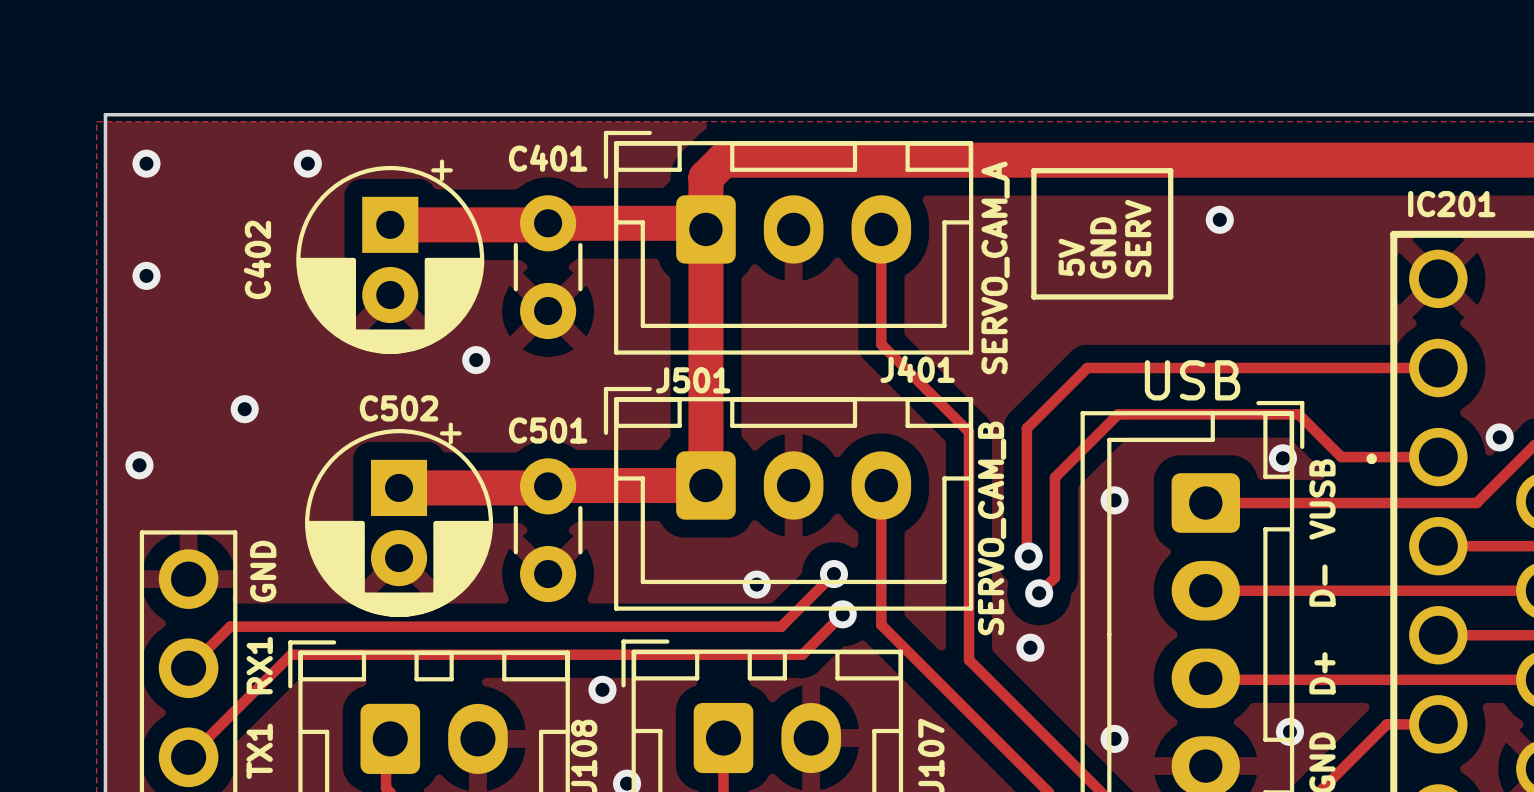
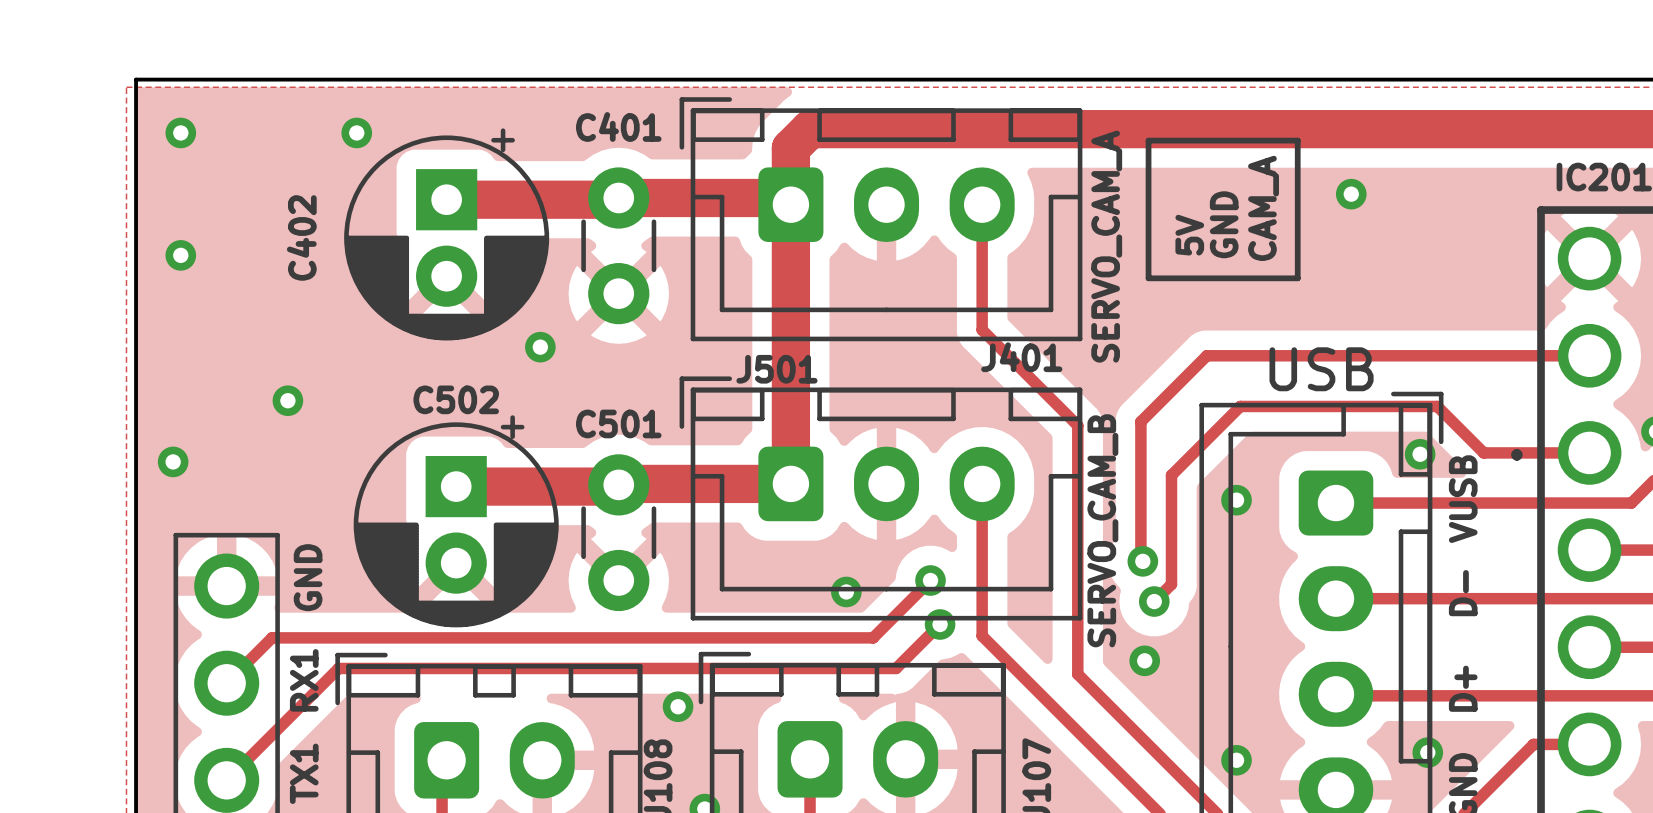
text: SERV (1138, 238) -> CAM_A (1263, 208)

